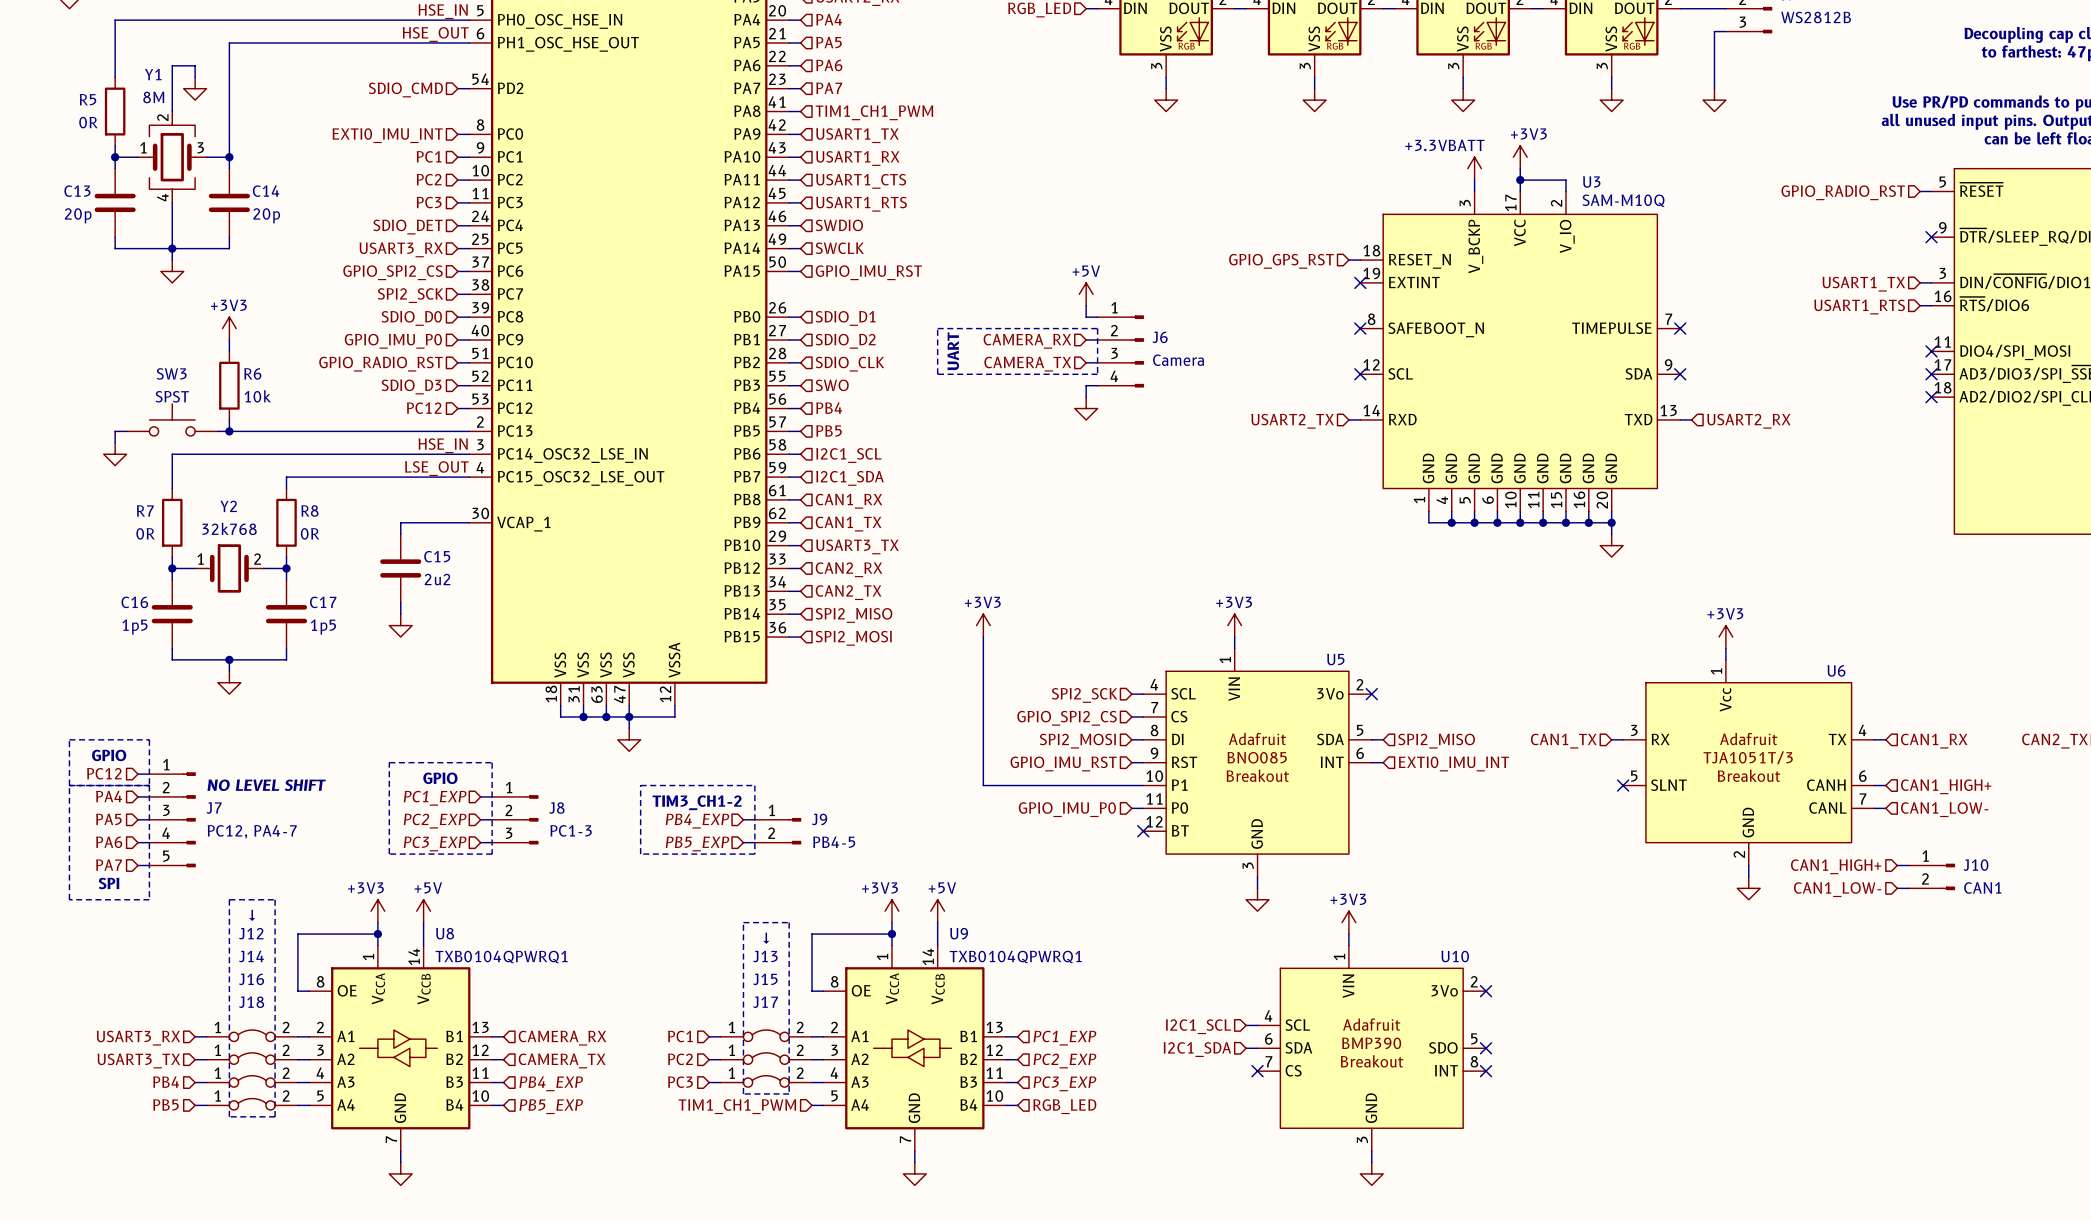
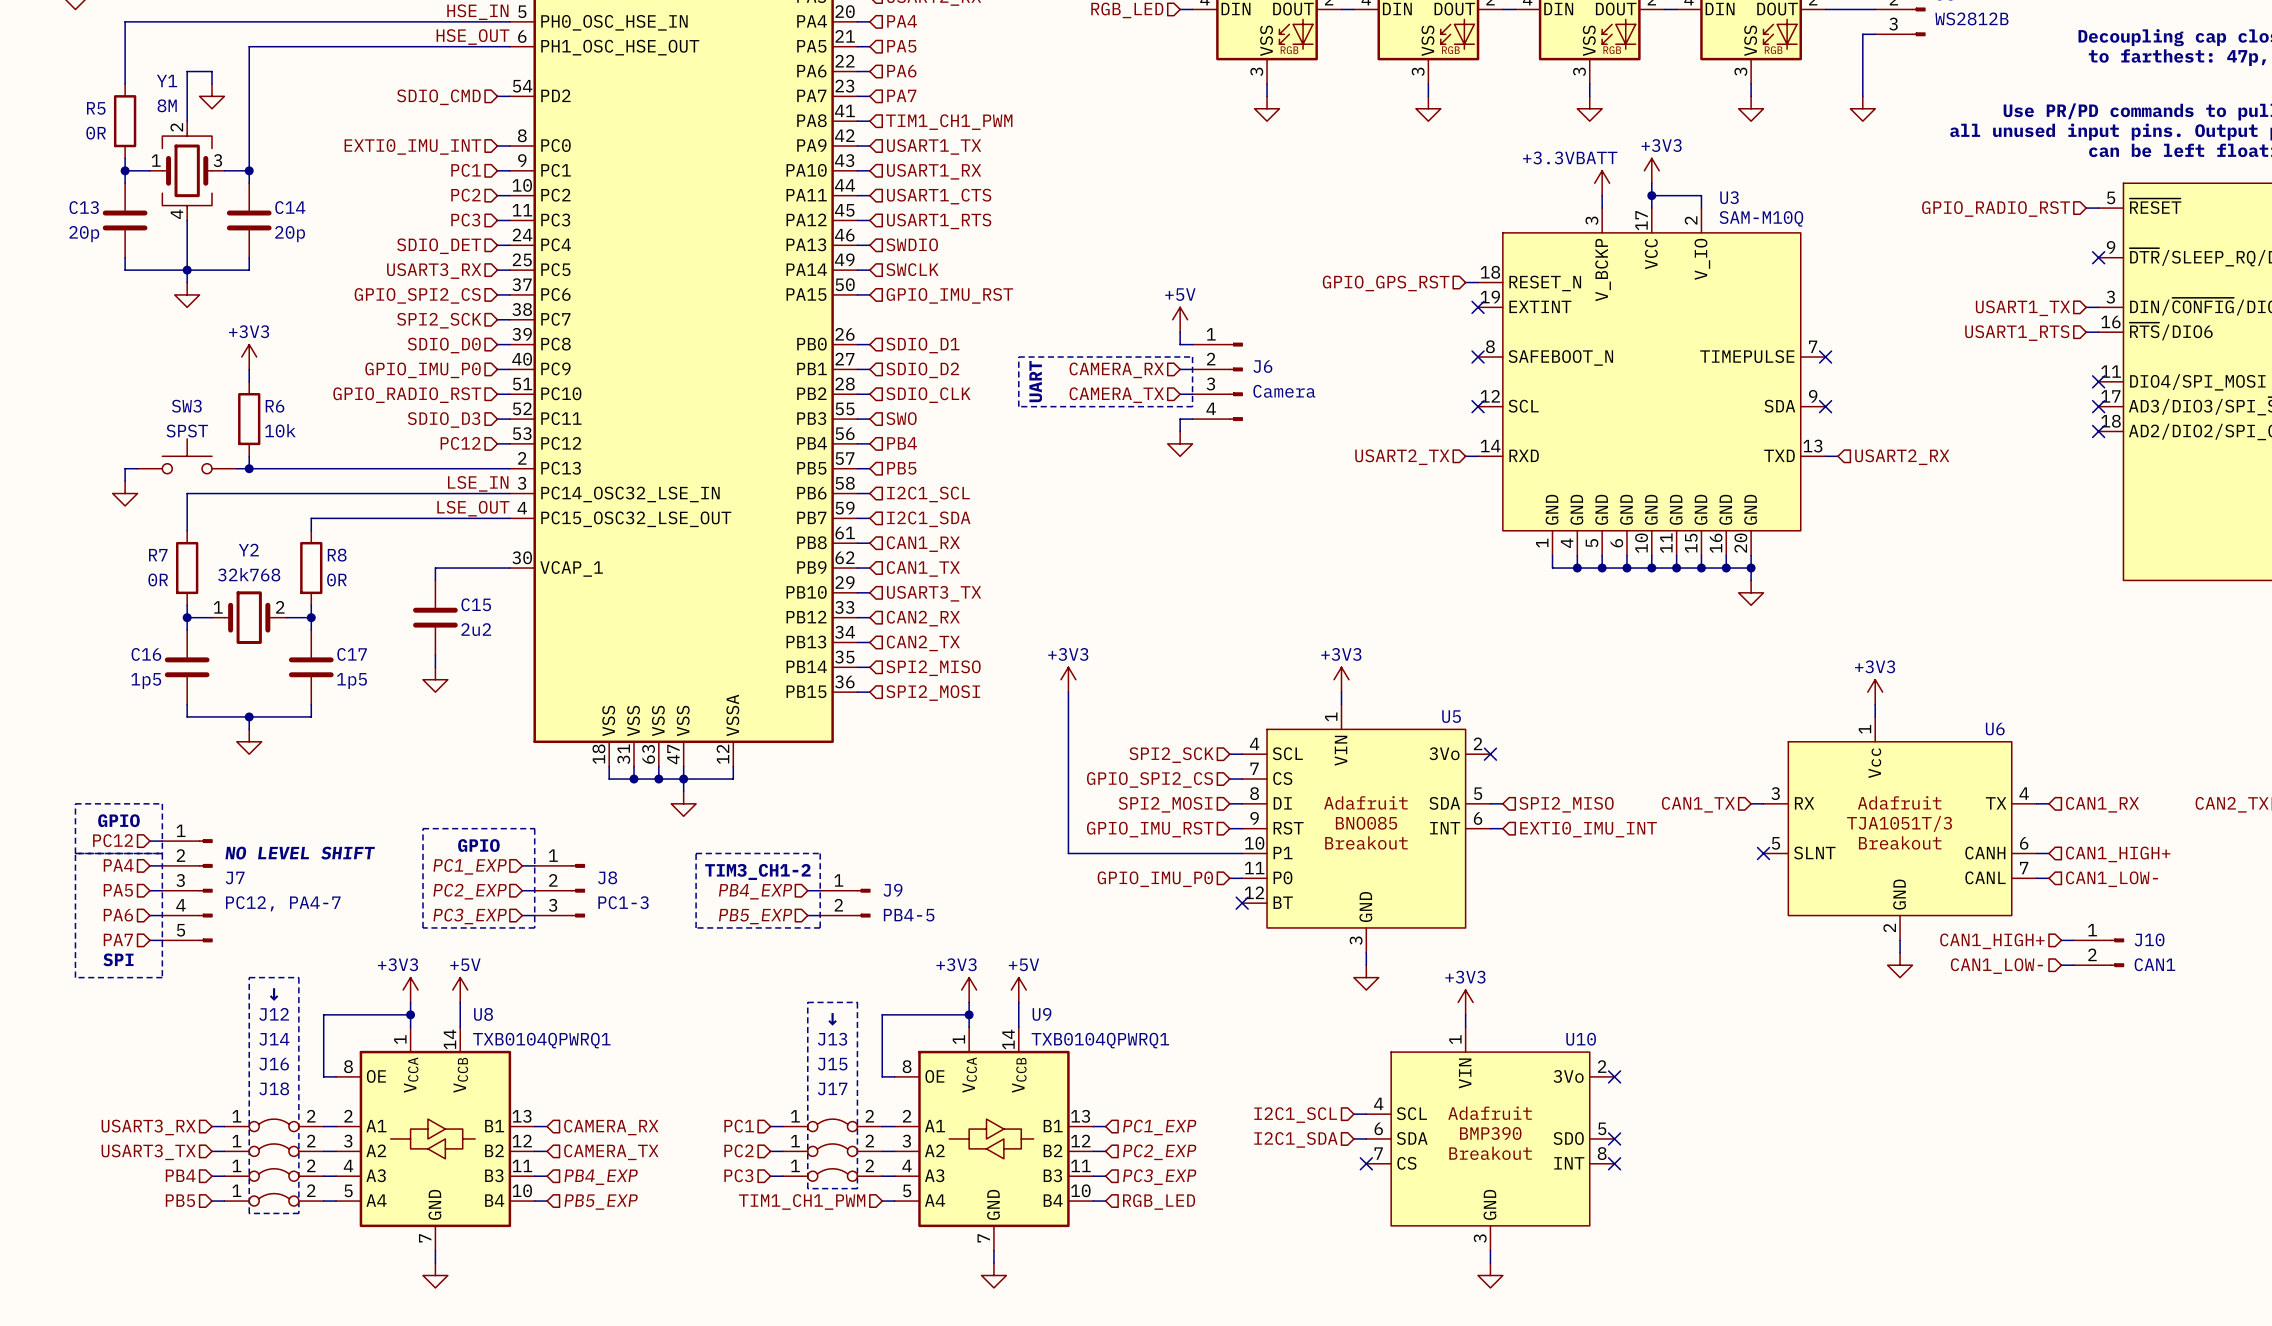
label: HSE_IN (443, 445) -> LSE_IN (478, 483)

